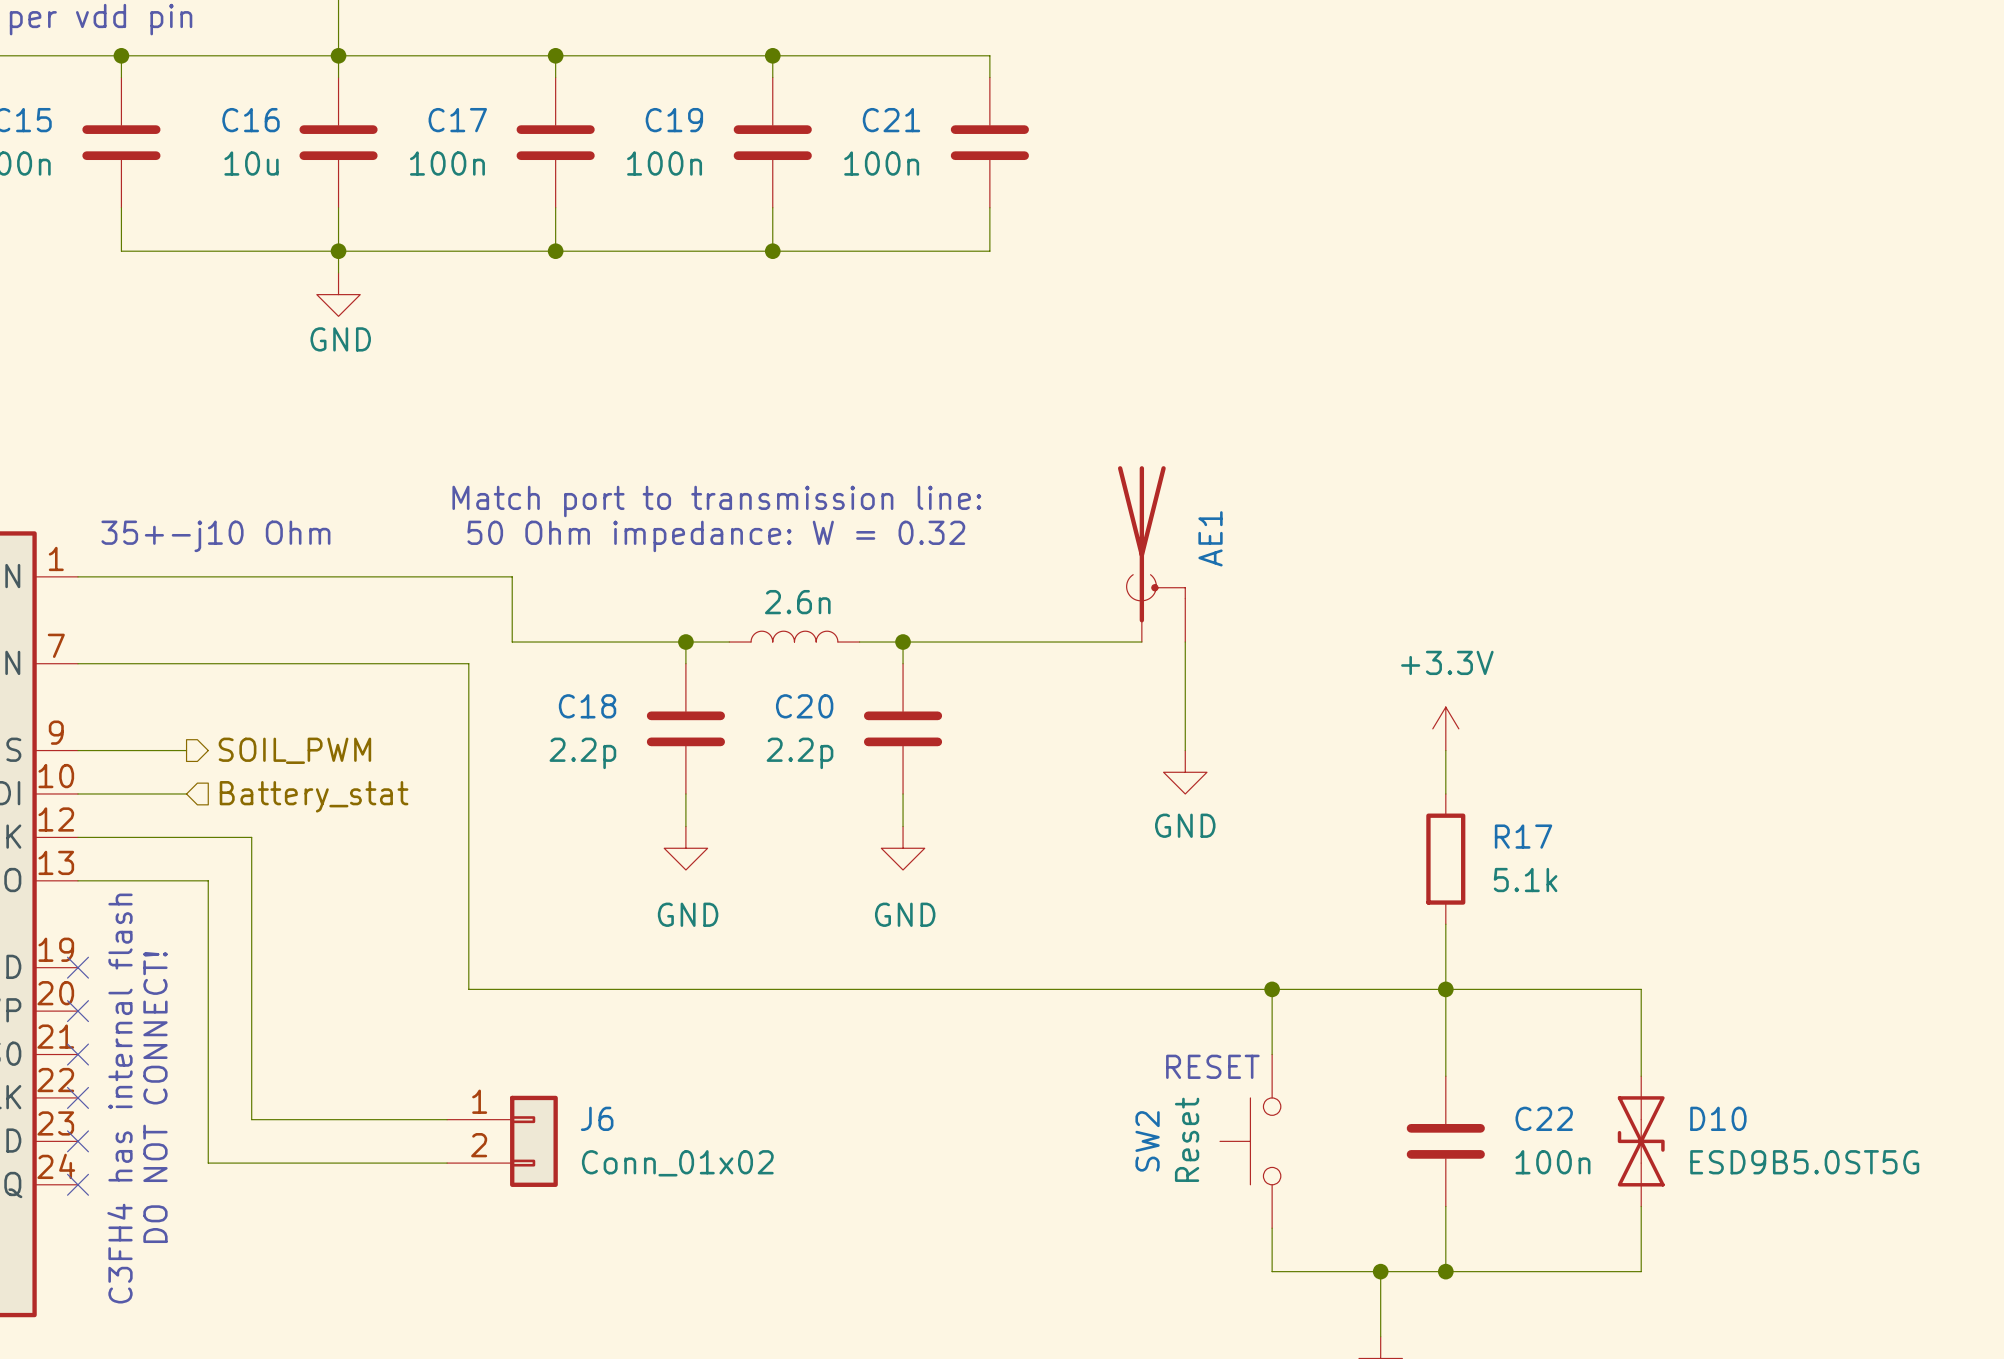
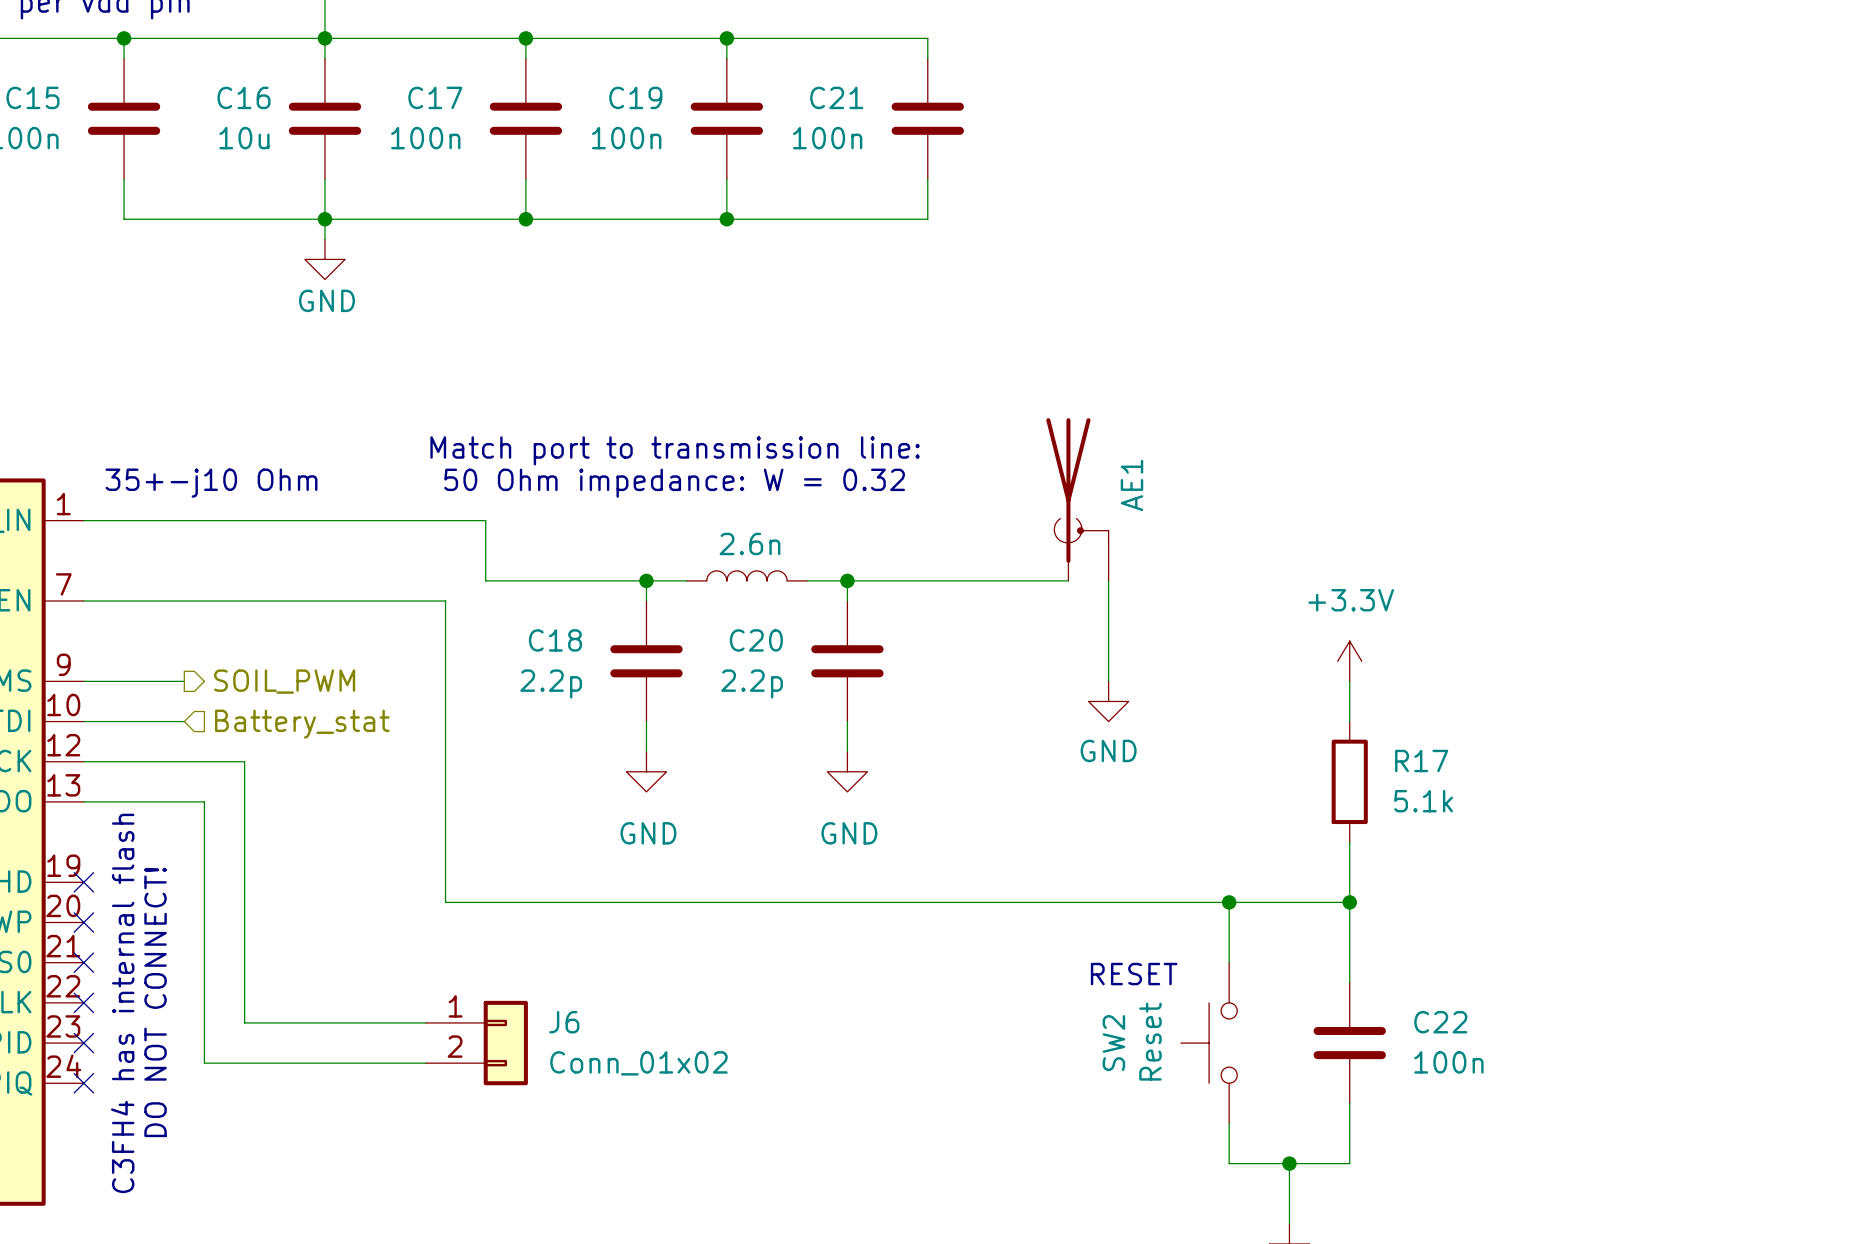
wire: (1272, 989) (1272, 1054) -> (1229, 902) (1229, 962)
junction position: (1272, 989) -> (1229, 902)
wire: (1445, 989) (1641, 989) (1641, 1076) -> none
SW2 position: (1250, 1141) -> (1209, 1043)
D10: ESD9B5.0ST5G (1641, 1141) -> none
wire: (1641, 1206) (1641, 1271) (1445, 1271) -> none
wire: (1272, 1228) (1272, 1271) (1315, 1271) -> (1229, 1123) (1229, 1163)
junction: (1445, 1271) -> none

